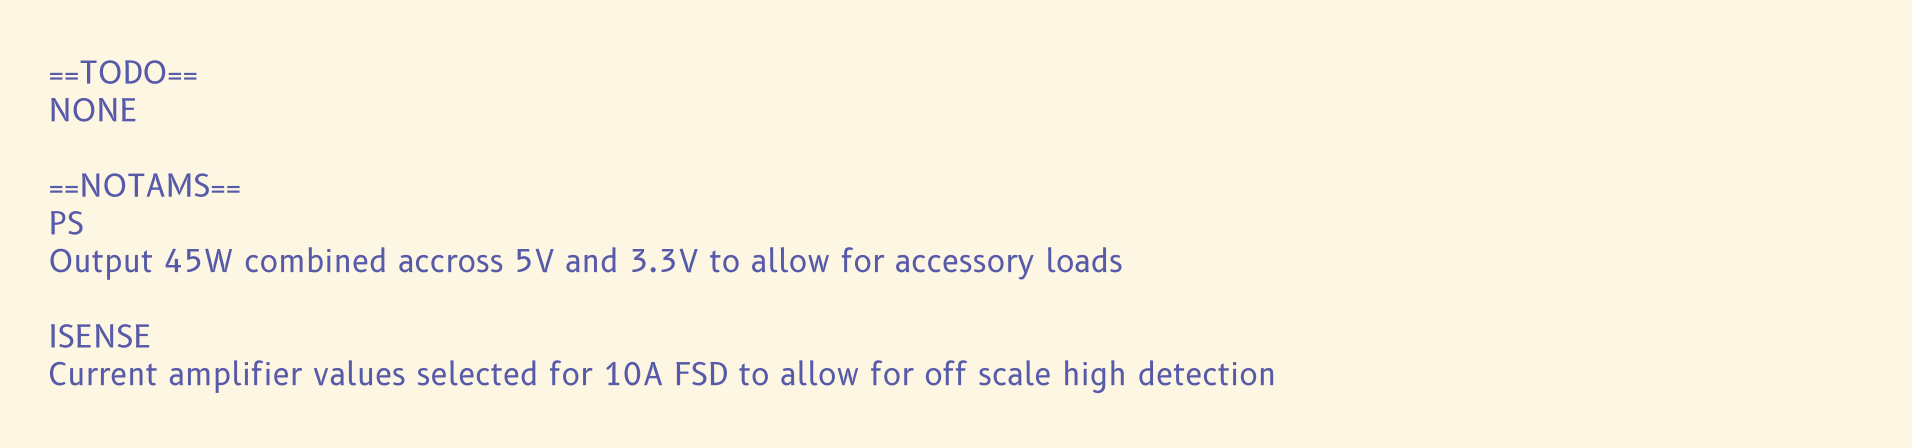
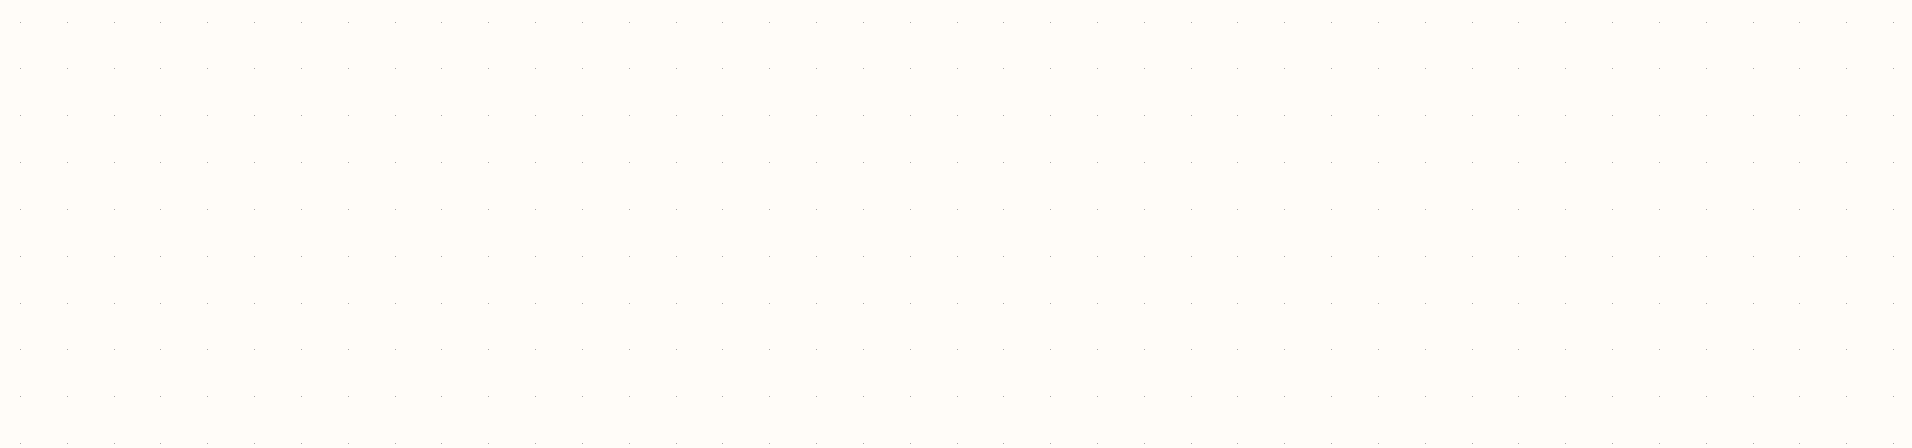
text: ==TODO== (123, 72) -> none
text: NONE (93, 109) -> none
text: ==NOTAMS== (144, 185) -> none
text: PS (66, 222) -> none
text: Output 45W combined accross 5V and 3.3V to allow for accessory loads (585, 263) -> none
text: ISENSE (100, 335) -> none
text: Current amplifier values selected for 10A FSD to allow for off scale high detection (661, 376) -> none

